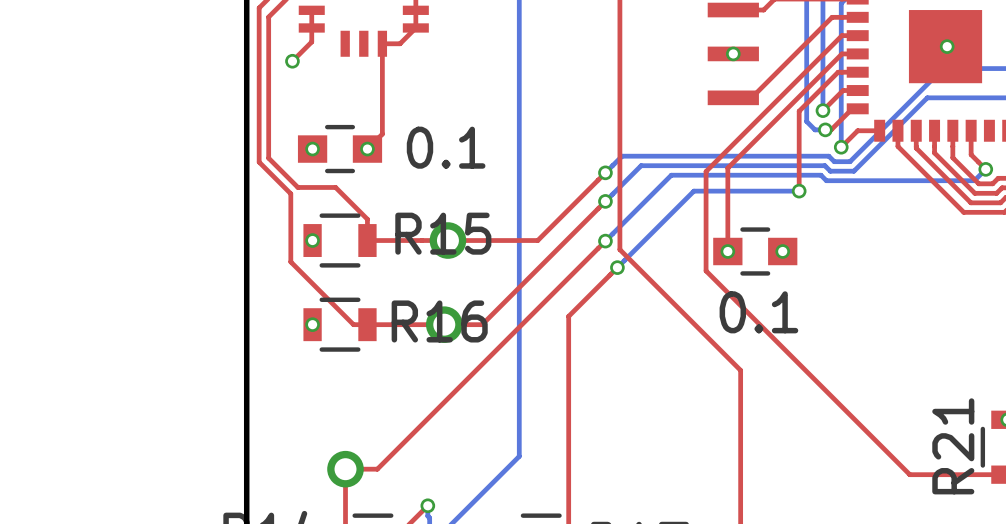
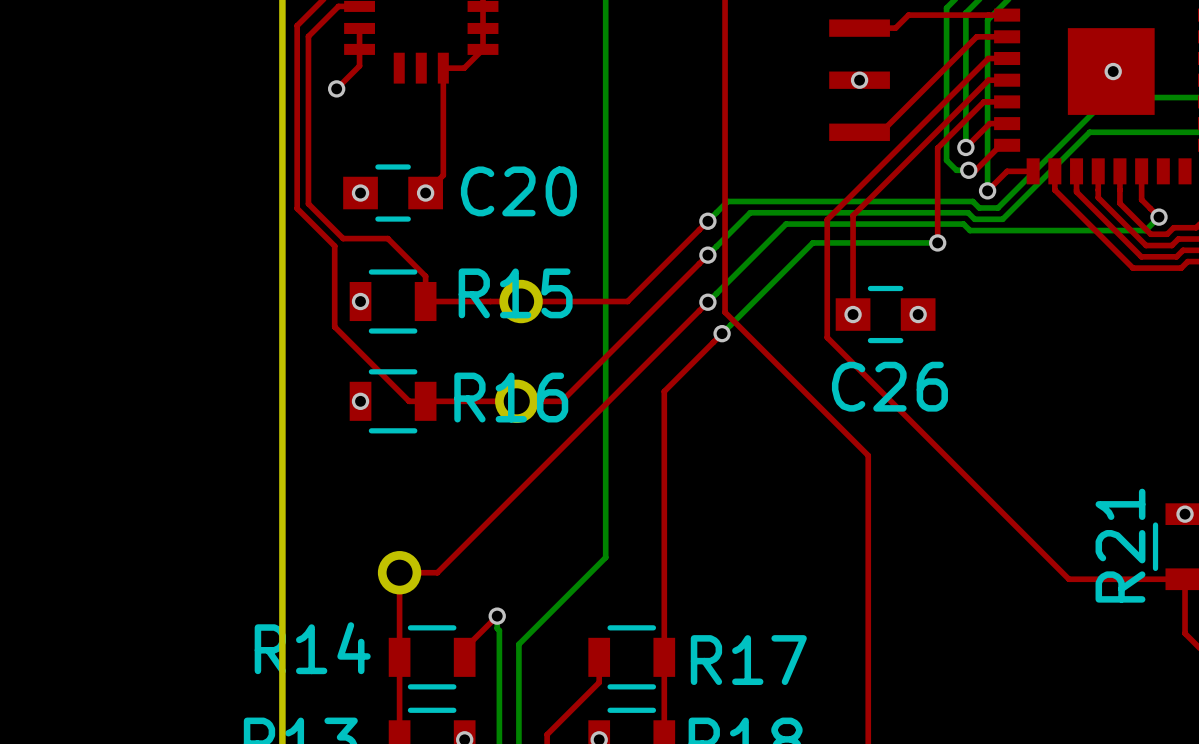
0.1 name: 0.1 (446, 147) -> C20 (518, 191)
0.1 name: 0.1 (758, 312) -> C26 (889, 386)

